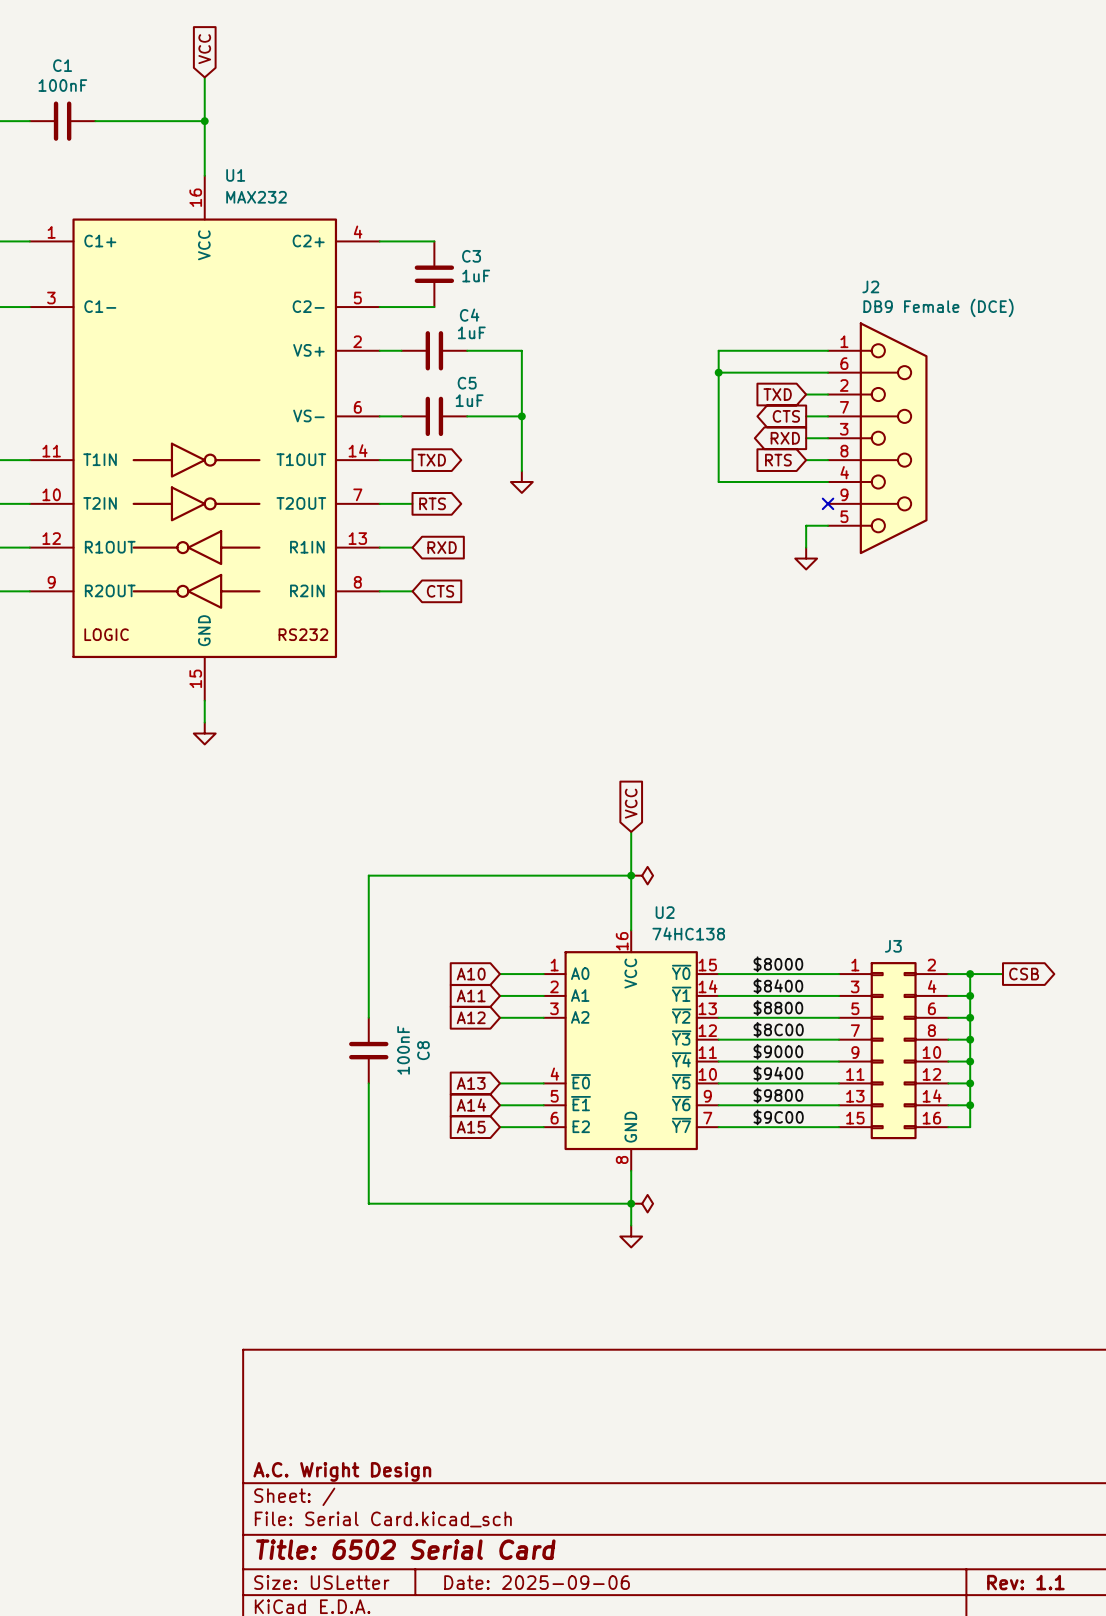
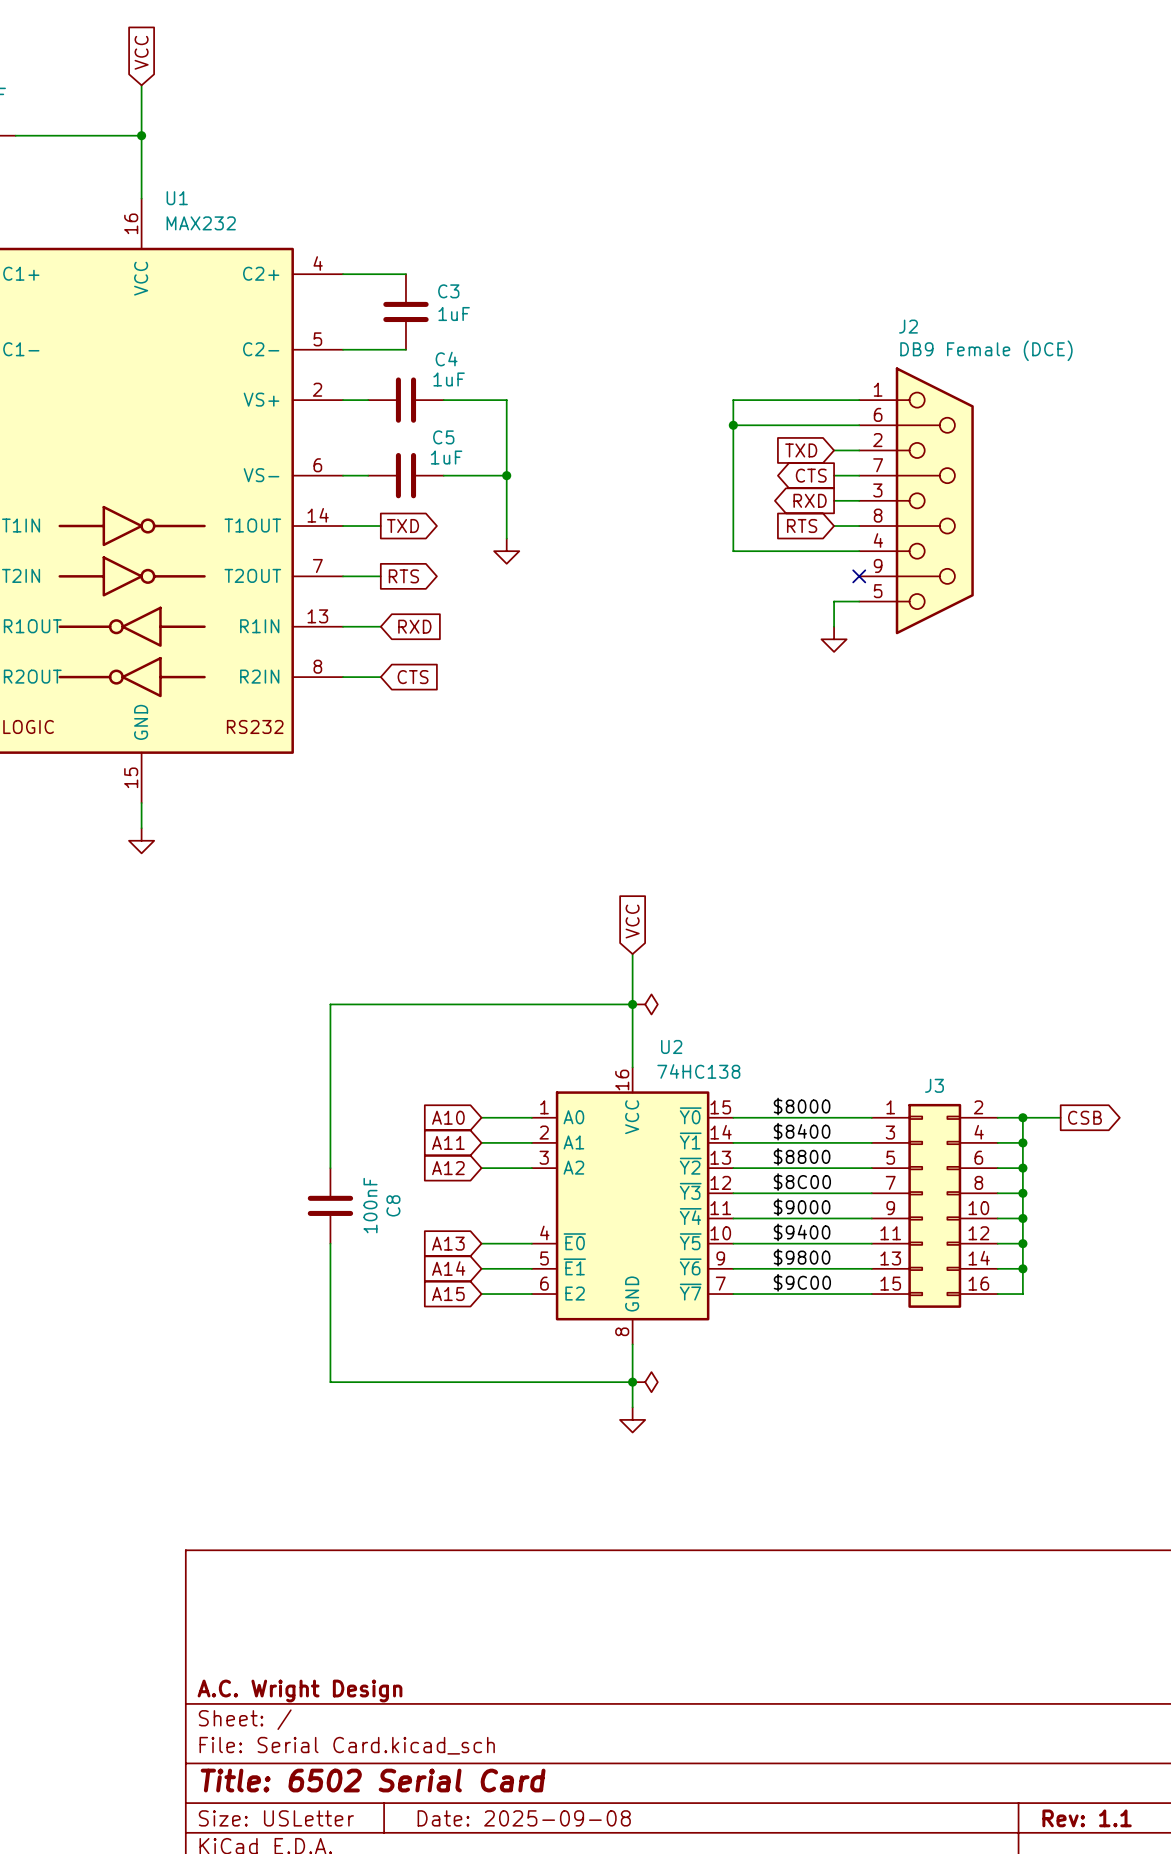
title block: Date: 2025-09-06 (537, 1582) -> Date: 2025-09-08 (524, 1818)

